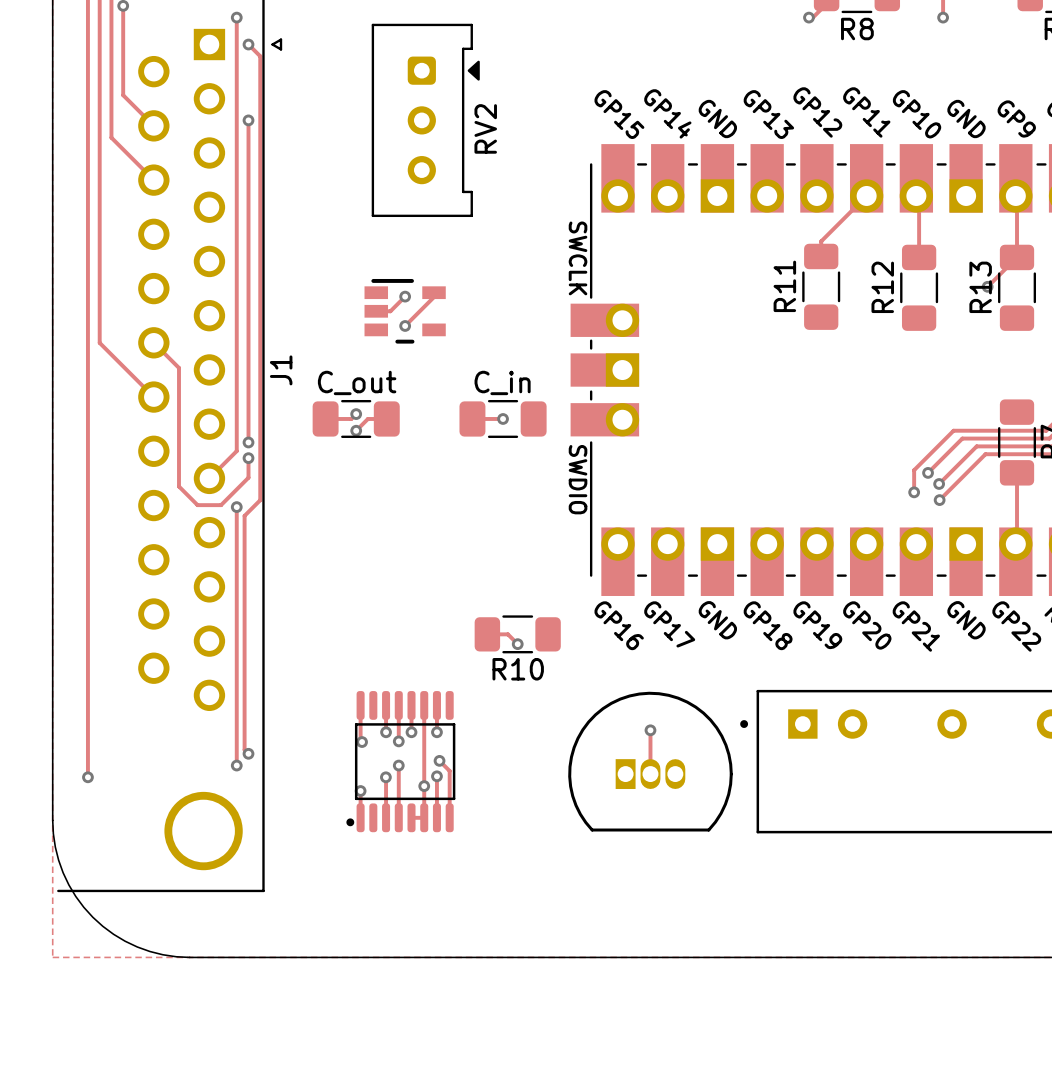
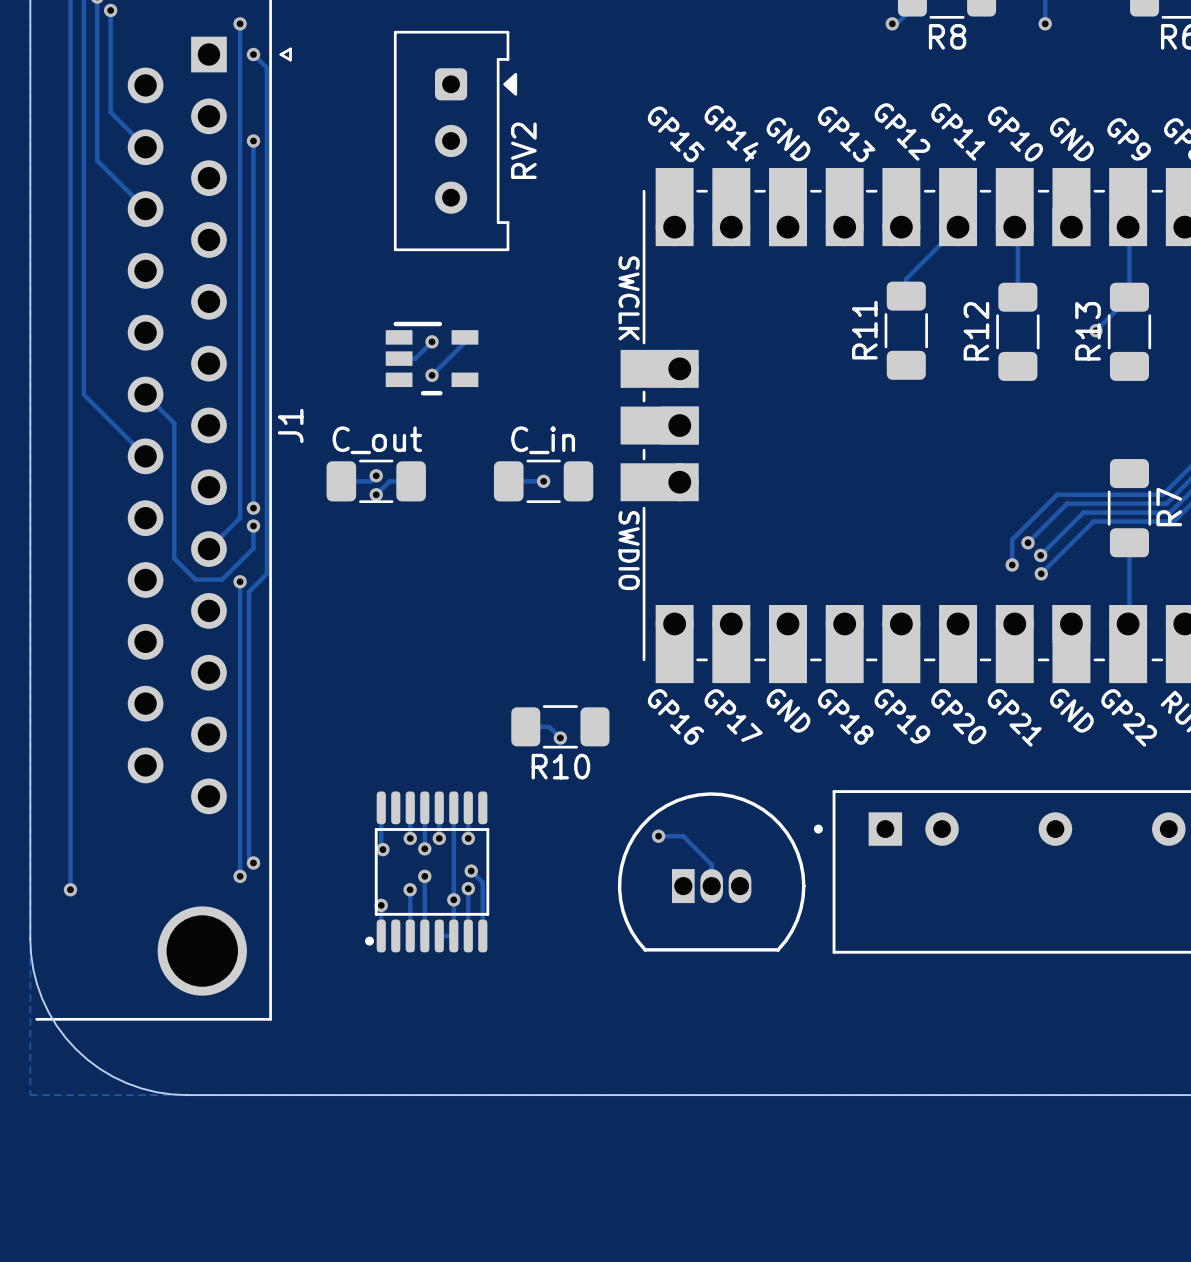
track: (650, 730) (650, 755) -> (658, 836) (683, 836) (711, 864)
via position: (650, 730) -> (658, 836)

